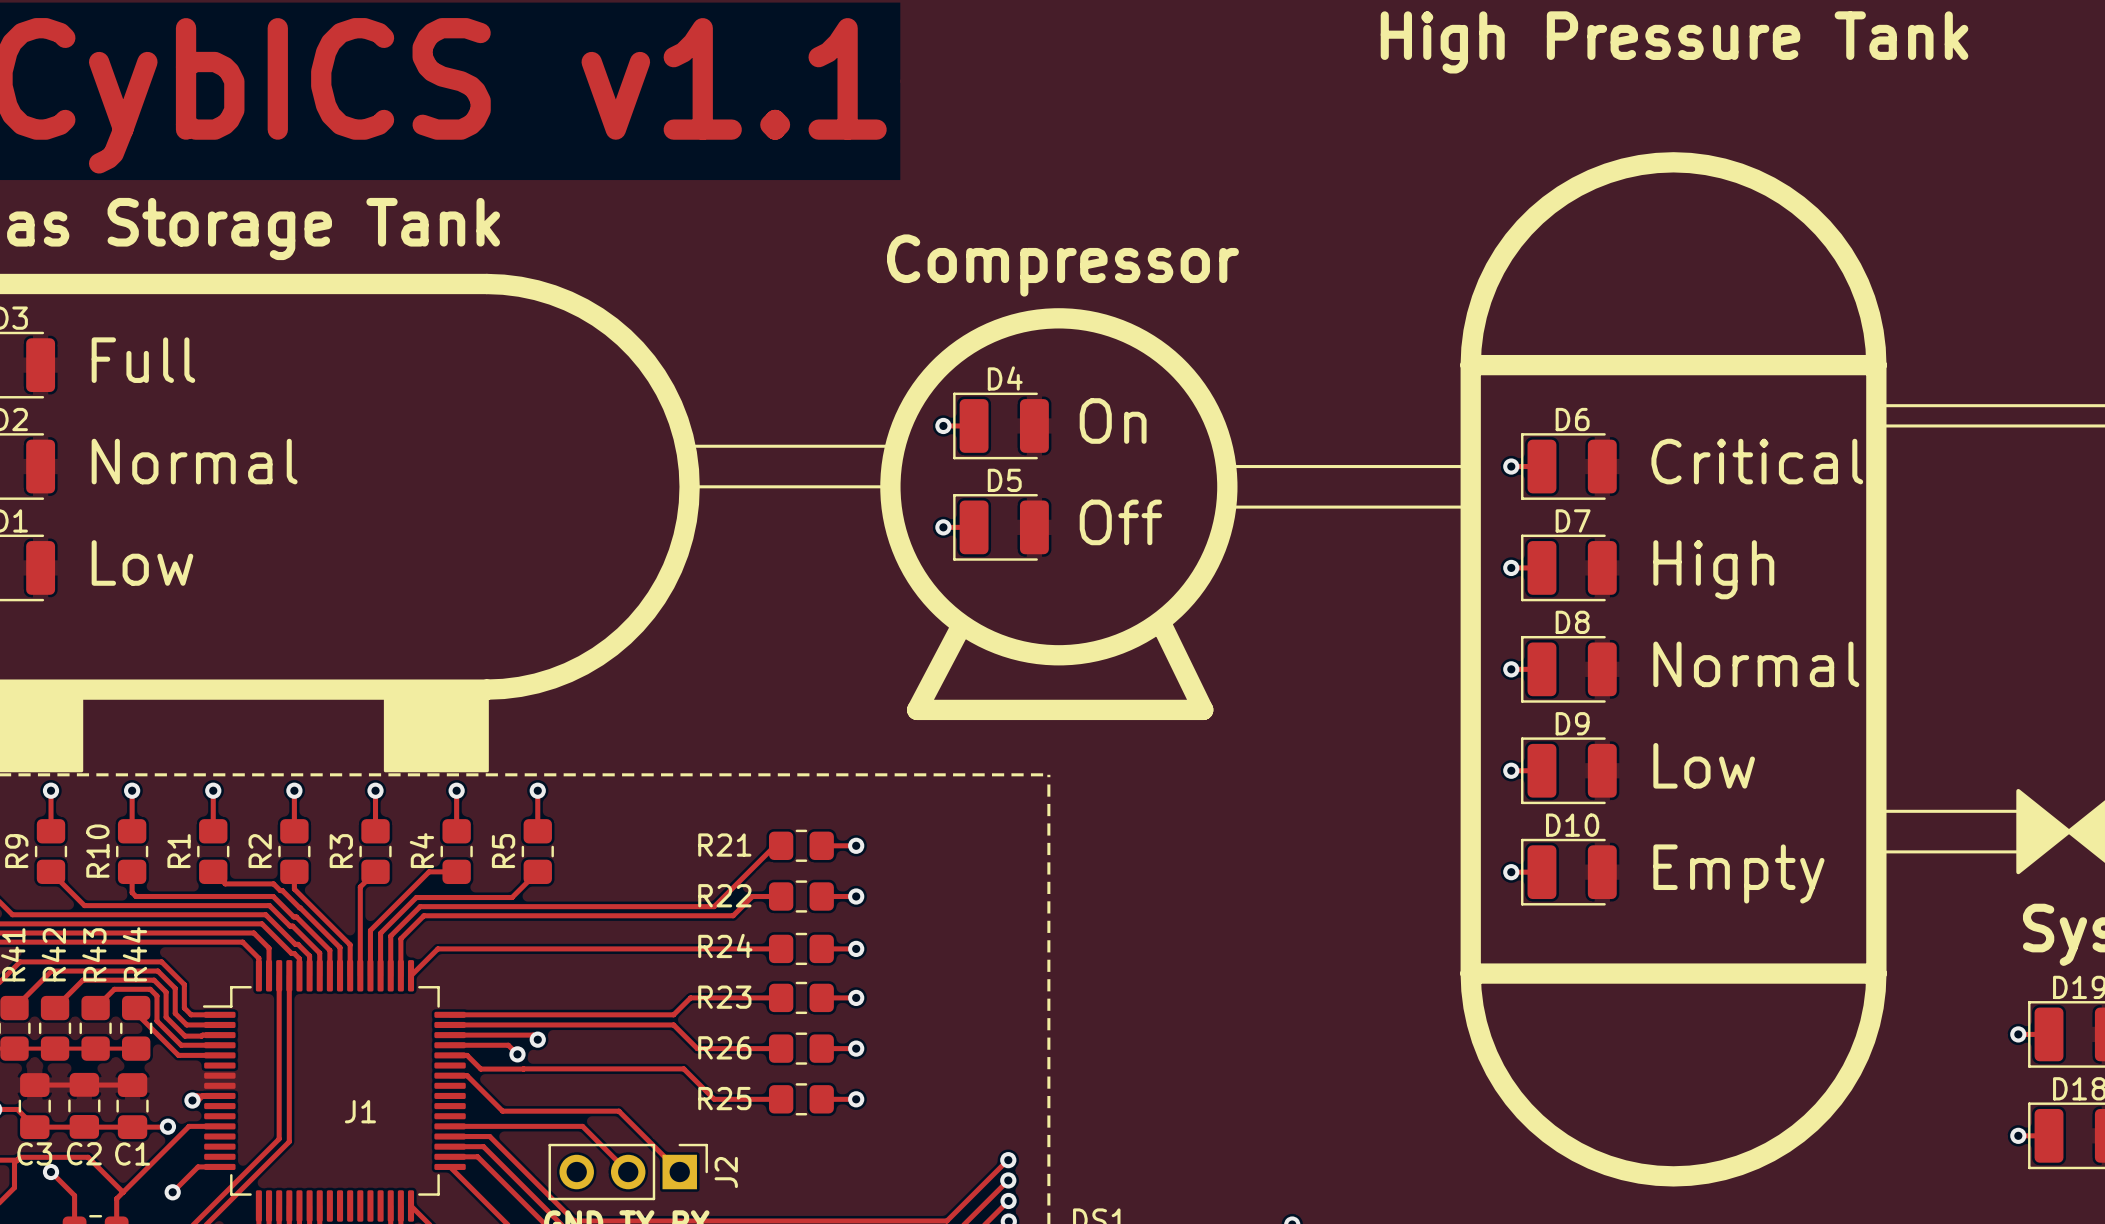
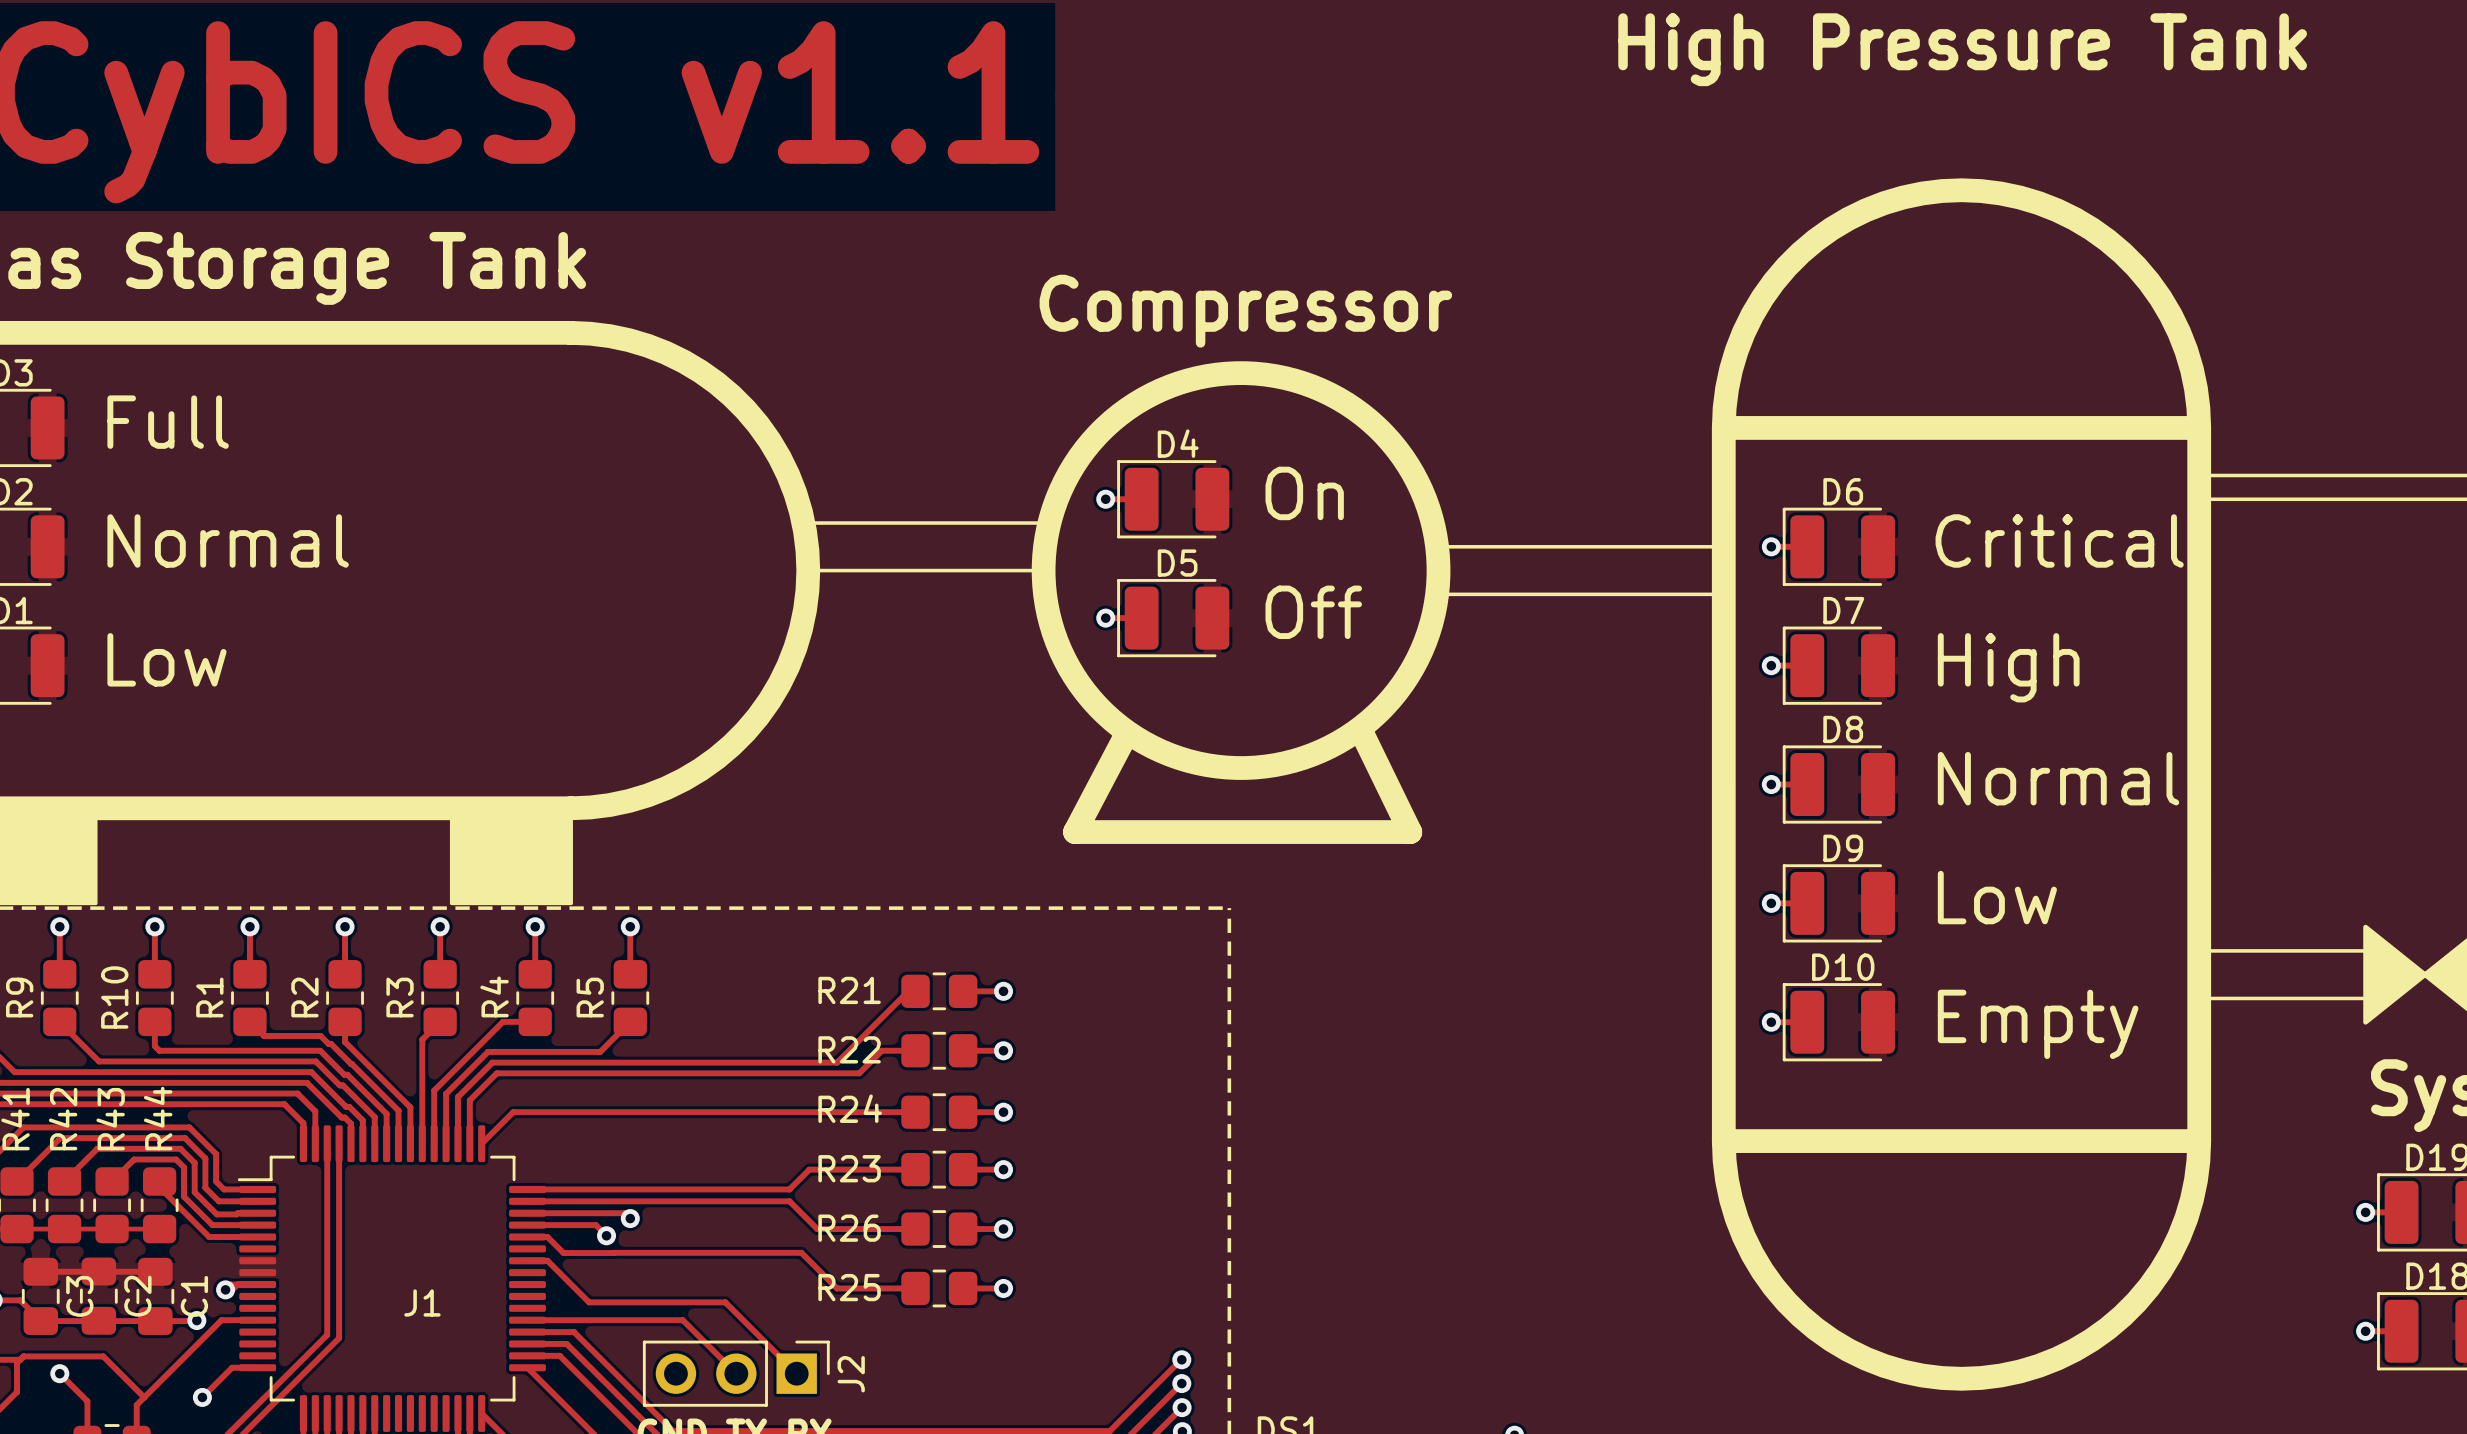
C2 name rotation: 0° (84, 1153) -> 90° counterclockwise (137, 1296)
C2 name position: C2 (84, 1153) -> C2 (137, 1296)
C3 name rotation: 0° (34, 1154) -> 90° counterclockwise (79, 1296)
C3 name position: C3 (34, 1154) -> C3 (79, 1296)
C1 name rotation: 0° (132, 1154) -> 90° counterclockwise (194, 1296)
C1 name position: C1 (132, 1154) -> C1 (194, 1296)

